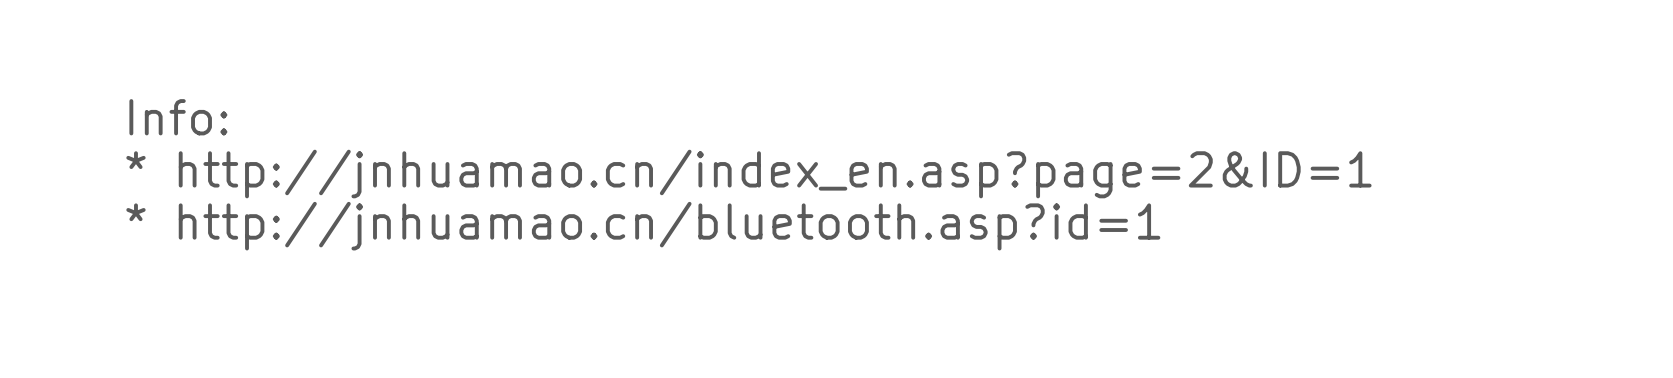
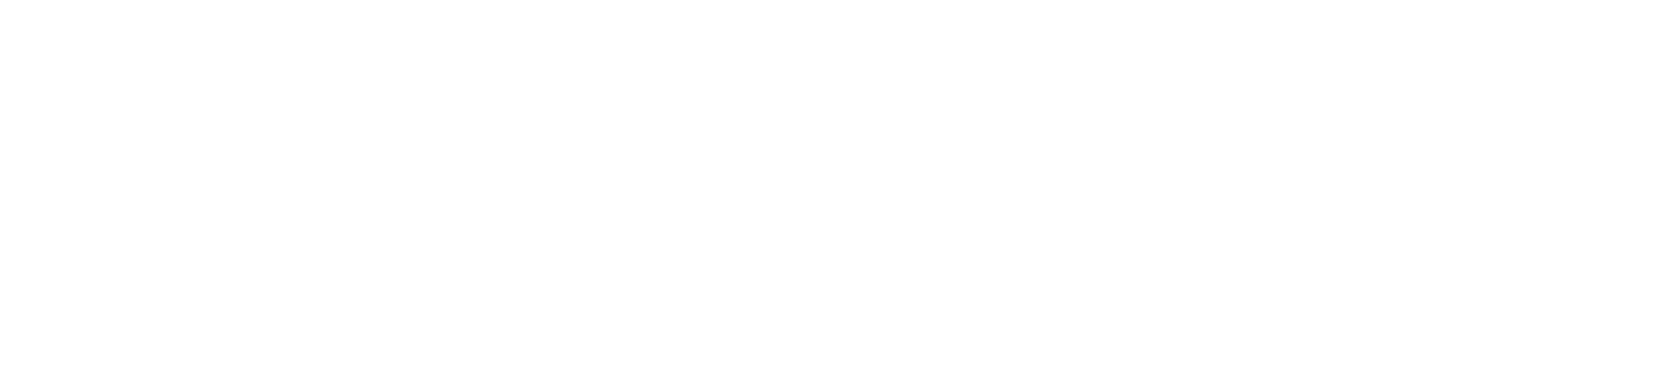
text: Info: (178, 117) -> none
text: * http://jnhuamao.cn/index_en.asp?page=2&ID=1 (748, 174) -> none
text: * http://jnhuamao.cn/bluetooth.asp?id=1 (643, 226) -> none

